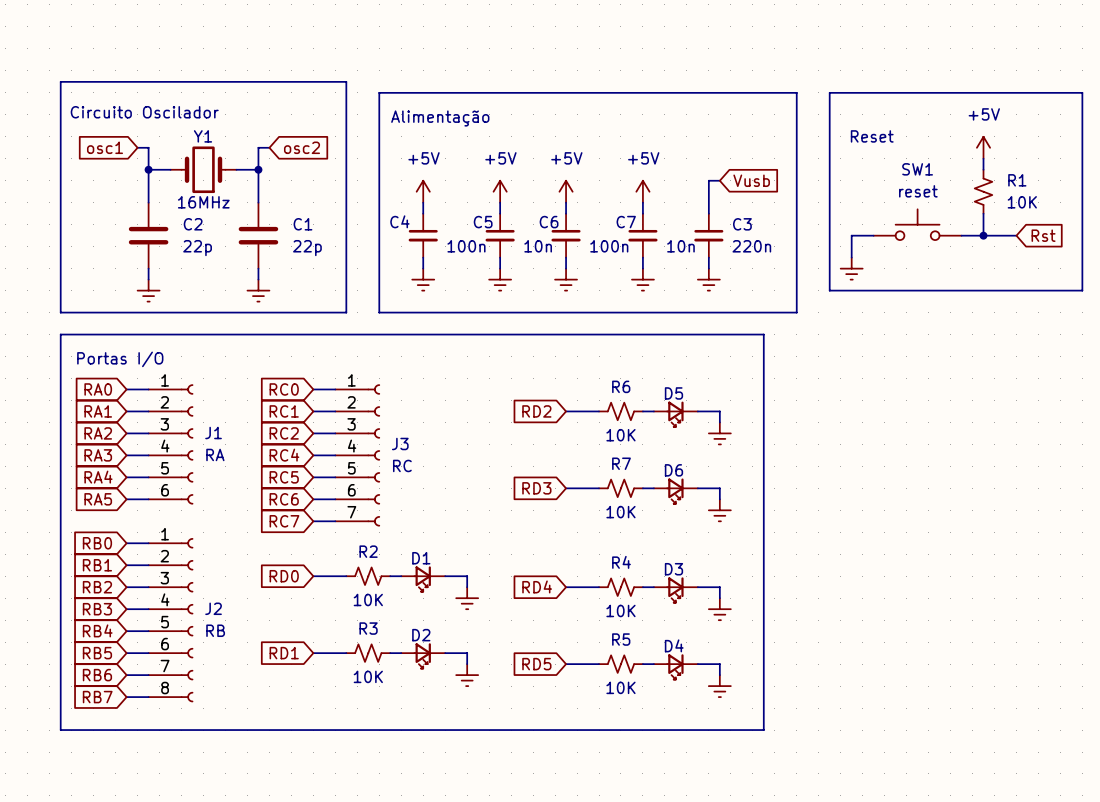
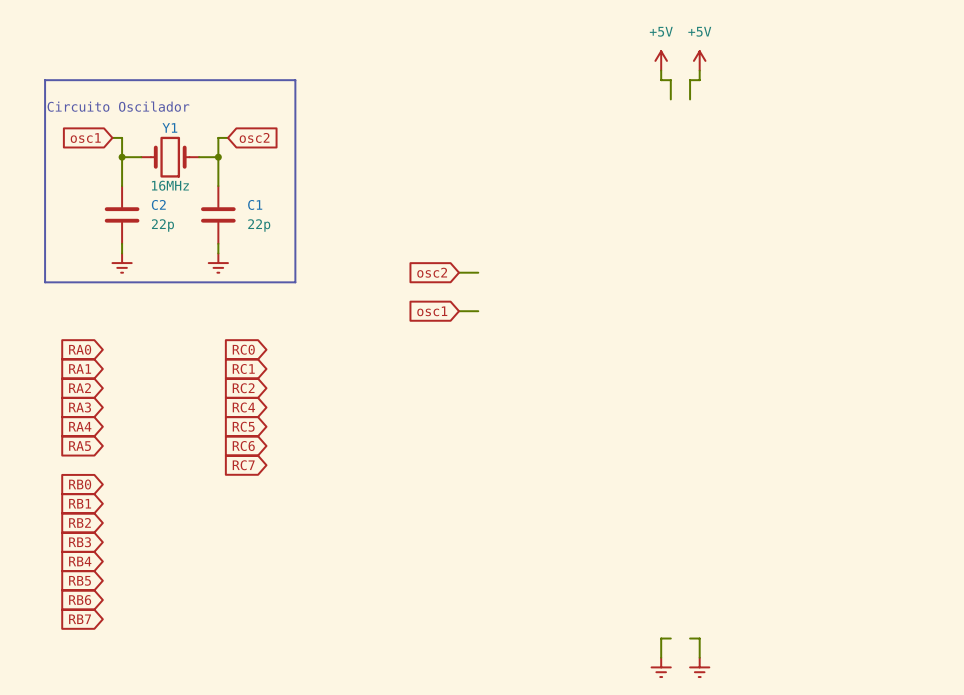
power symbol: none -> +5V (661, 60)
power symbol: none -> +5V (699, 60)
wire: none -> (661, 70) (661, 80) (670, 80) (670, 99)
wire: none -> (699, 70) (699, 80) (690, 80) (690, 99)
line: (379, 92) (796, 92) (796, 312) (379, 312) (379, 92) -> none
line: (829, 92) (1082, 92) (1082, 290) (829, 290) (829, 92) -> none
text: Alimentação (440, 118) -> none
text: Reset (872, 136) -> none
power symbol: +5V (983, 147) -> none
wire: (983, 158) (983, 169) -> none
wire: (719, 180) (708, 180) (708, 213) -> none
global label: Vusb (751, 180) -> none
power symbol: +5V (423, 191) -> none
power symbol: +5V (500, 191) -> none
power symbol: +5V (566, 191) -> none
power symbol: +5V (642, 191) -> none
R1: 10K (983, 191) -> none
wire: (423, 202) (423, 213) -> none
wire: (500, 202) (500, 213) -> none
wire: (566, 202) (566, 213) -> none
wire: (642, 202) (642, 213) -> none
wire: (983, 213) (983, 235) -> none
SW1: reset (917, 224) -> none
C4: 100n (423, 235) -> none
C5: 10n (500, 235) -> none
C6: 100n (566, 235) -> none
C7: 10n (642, 235) -> none
C3: 220n (708, 235) -> none
wire: (873, 235) (851, 235) (851, 257) -> none
wire: (961, 235) (1016, 235) -> none
junction: (983, 235) -> none
global label: Rst (1043, 235) -> none
wire: (423, 257) (423, 268) -> none
wire: (500, 257) (500, 268) -> none
wire: (566, 257) (566, 268) -> none
wire: (642, 257) (642, 268) -> none
wire: (708, 257) (708, 268) -> none
power symbol: (851, 268) -> none
power symbol: (423, 279) -> none
power symbol: (500, 279) -> none
power symbol: (566, 279) -> none
power symbol: (642, 279) -> none
power symbol: (708, 279) -> none
global label: none -> osc2 (432, 272)
wire: none -> (459, 272) (478, 272)
line: (60, 334) (763, 334) (763, 730) (60, 730) (60, 334) -> none
global label: none -> osc1 (432, 311)
wire: none -> (459, 311) (478, 311)
text: Portas I/O (120, 359) -> none
wire: (126, 389) (148, 389) -> none
wire: (313, 389) (335, 389) -> none
wire: (126, 411) (148, 411) -> none
wire: (313, 411) (335, 411) -> none
global label: RD2 (536, 411) -> none
wire: (566, 411) (599, 411) -> none
R6: 10K (620, 411) -> none
wire: (642, 411) (653, 411) -> none
wire: (697, 411) (719, 411) (719, 422) -> none
D5: (675, 414) -> none
wire: (126, 433) (148, 433) -> none
wire: (313, 433) (335, 433) -> none
power symbol: (719, 433) -> none
J1: RA (170, 444) -> none
wire: (126, 455) (148, 455) -> none
wire: (313, 455) (335, 455) -> none
J3: RC (357, 455) -> none
wire: (126, 477) (148, 477) -> none
wire: (313, 477) (335, 477) -> none
global label: RD3 (536, 488) -> none
wire: (566, 488) (599, 488) -> none
R7: 10K (620, 488) -> none
wire: (642, 488) (653, 488) -> none
wire: (697, 488) (719, 488) (719, 499) -> none
D6: (675, 491) -> none
wire: (126, 499) (148, 499) -> none
wire: (313, 499) (335, 499) -> none
power symbol: (719, 510) -> none
wire: (313, 521) (335, 521) -> none
wire: (126, 543) (148, 543) -> none
wire: (126, 565) (148, 565) -> none
global label: RD0 (284, 576) -> none
wire: (313, 576) (346, 576) -> none
R2: 10K (368, 576) -> none
wire: (390, 576) (401, 576) -> none
wire: (445, 576) (467, 576) (467, 587) -> none
D1: (423, 578) -> none
global label: RD4 (537, 586) -> none
wire: (126, 587) (148, 587) -> none
wire: (566, 587) (599, 587) -> none
R4: 10K (620, 587) -> none
wire: (642, 587) (653, 587) -> none
wire: (697, 587) (719, 587) (719, 598) -> none
D3: (675, 589) -> none
power symbol: (467, 598) -> none
wire: (126, 609) (148, 609) -> none
power symbol: (719, 609) -> none
J2: RB (170, 620) -> none
wire: (126, 631) (148, 631) -> none
wire: (126, 653) (148, 653) -> none
global label: RD1 (284, 653) -> none
wire: (313, 653) (346, 653) -> none
R3: 10K (368, 653) -> none
wire: (390, 653) (401, 653) -> none
wire: (445, 653) (467, 653) (467, 664) -> none
D2: (423, 655) -> none
global label: RD5 (536, 664) -> none
wire: (566, 664) (599, 664) -> none
R5: 10K (620, 664) -> none
wire: (642, 664) (653, 664) -> none
wire: (697, 664) (719, 664) (719, 675) -> none
D4: (675, 666) -> none
wire: (126, 675) (148, 675) -> none
power symbol: (467, 675) -> none
power symbol: (719, 686) -> none
wire: (126, 697) (148, 697) -> none
wire: none -> (670, 638) (661, 638) (661, 657)
wire: none -> (690, 638) (699, 638) (699, 657)
power symbol: none -> (661, 667)
power symbol: none -> (699, 667)

